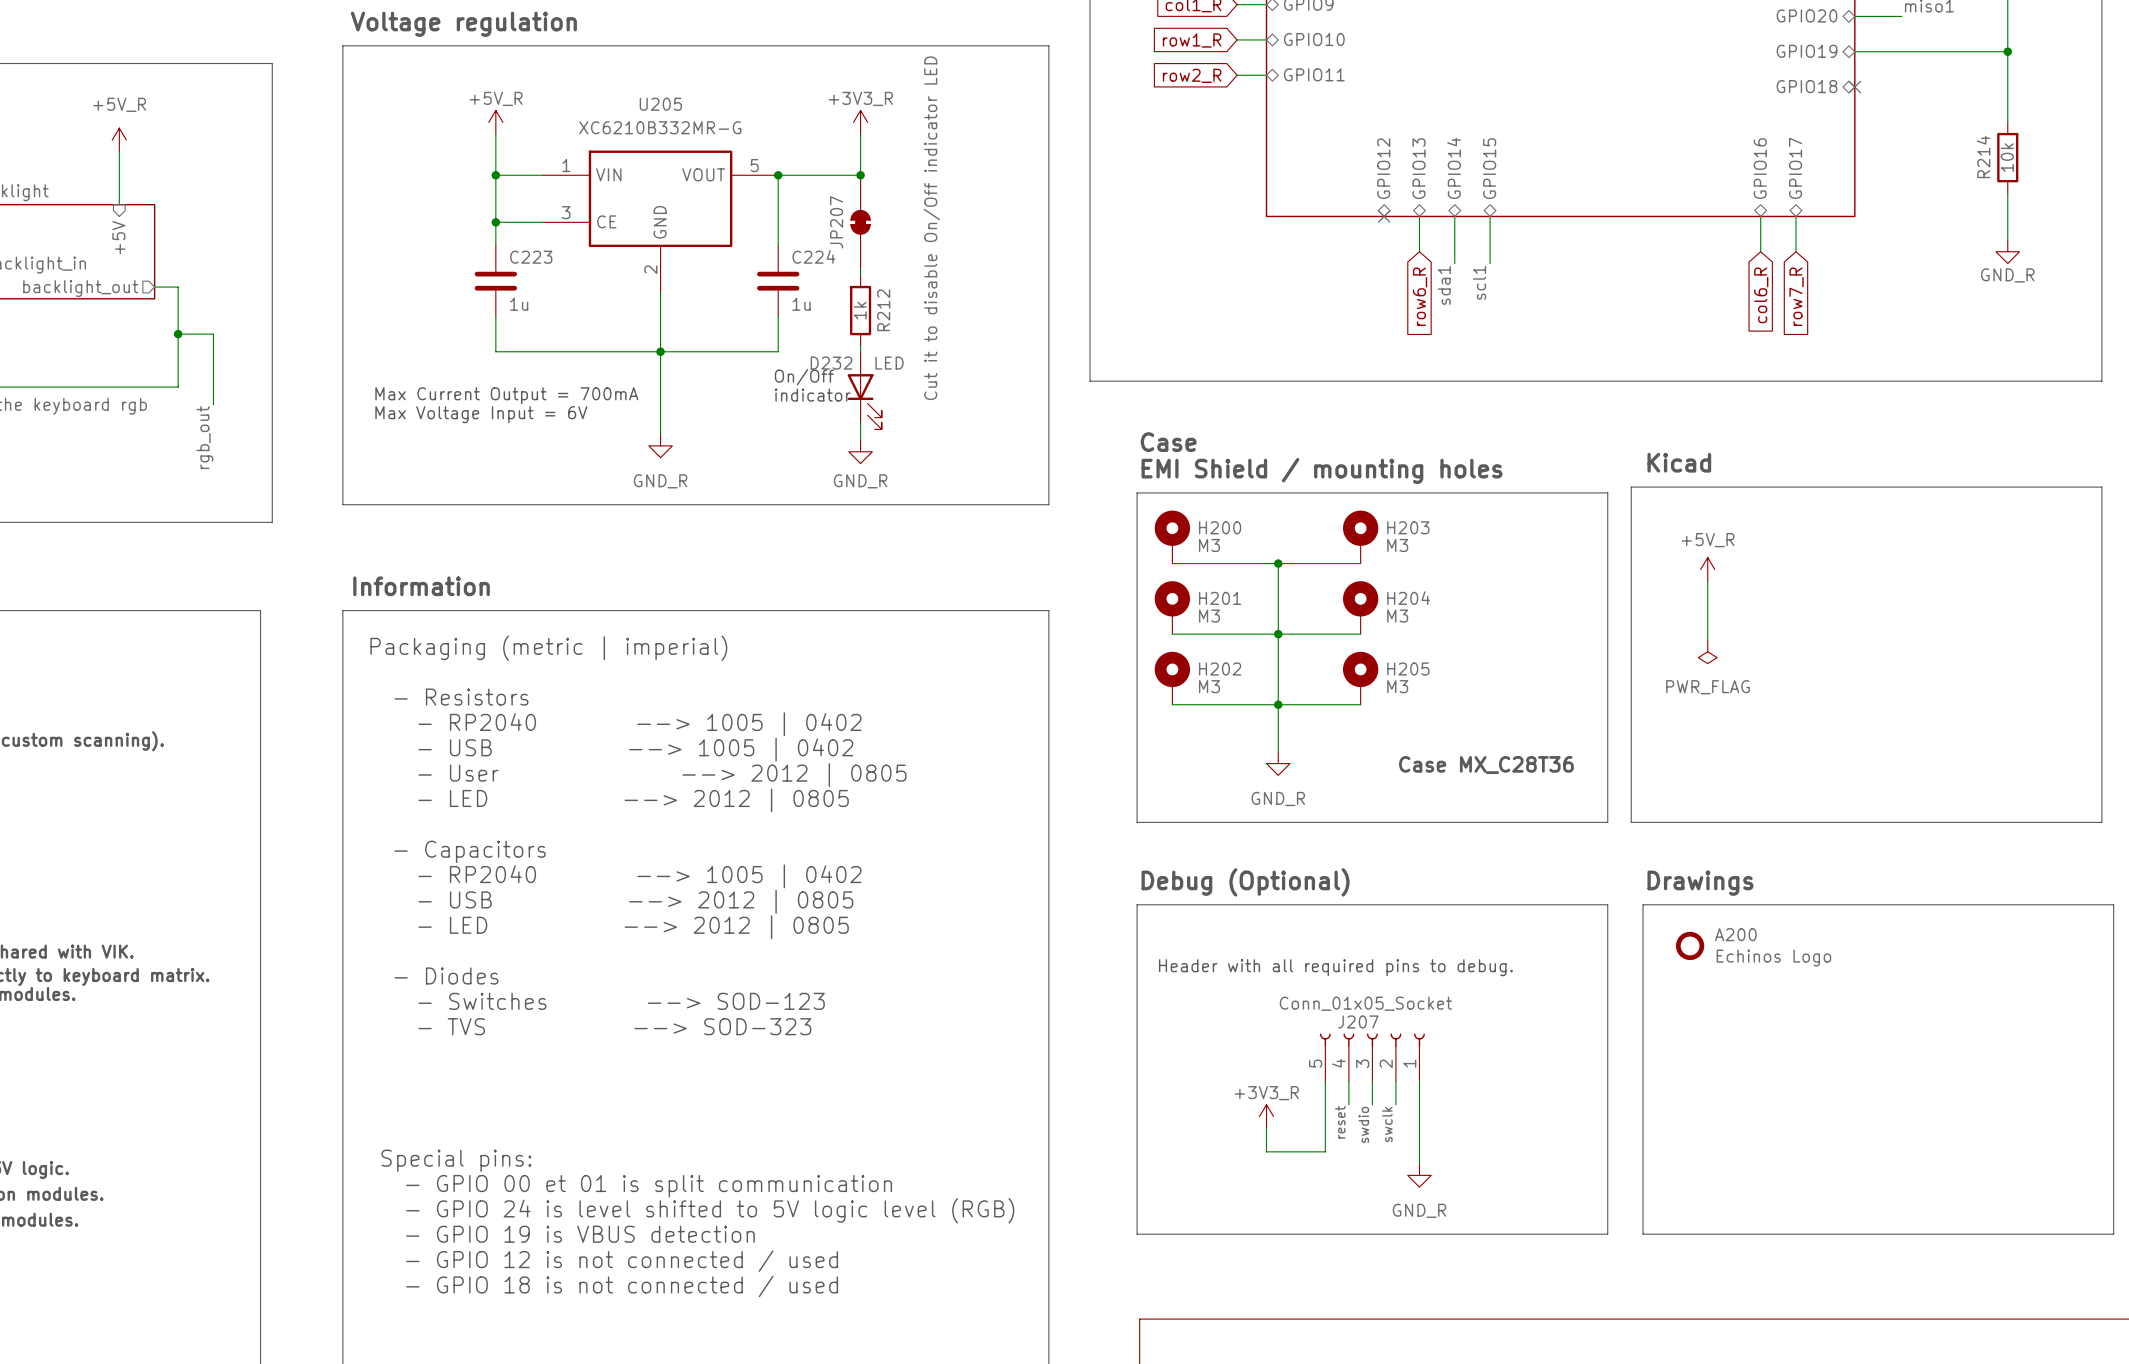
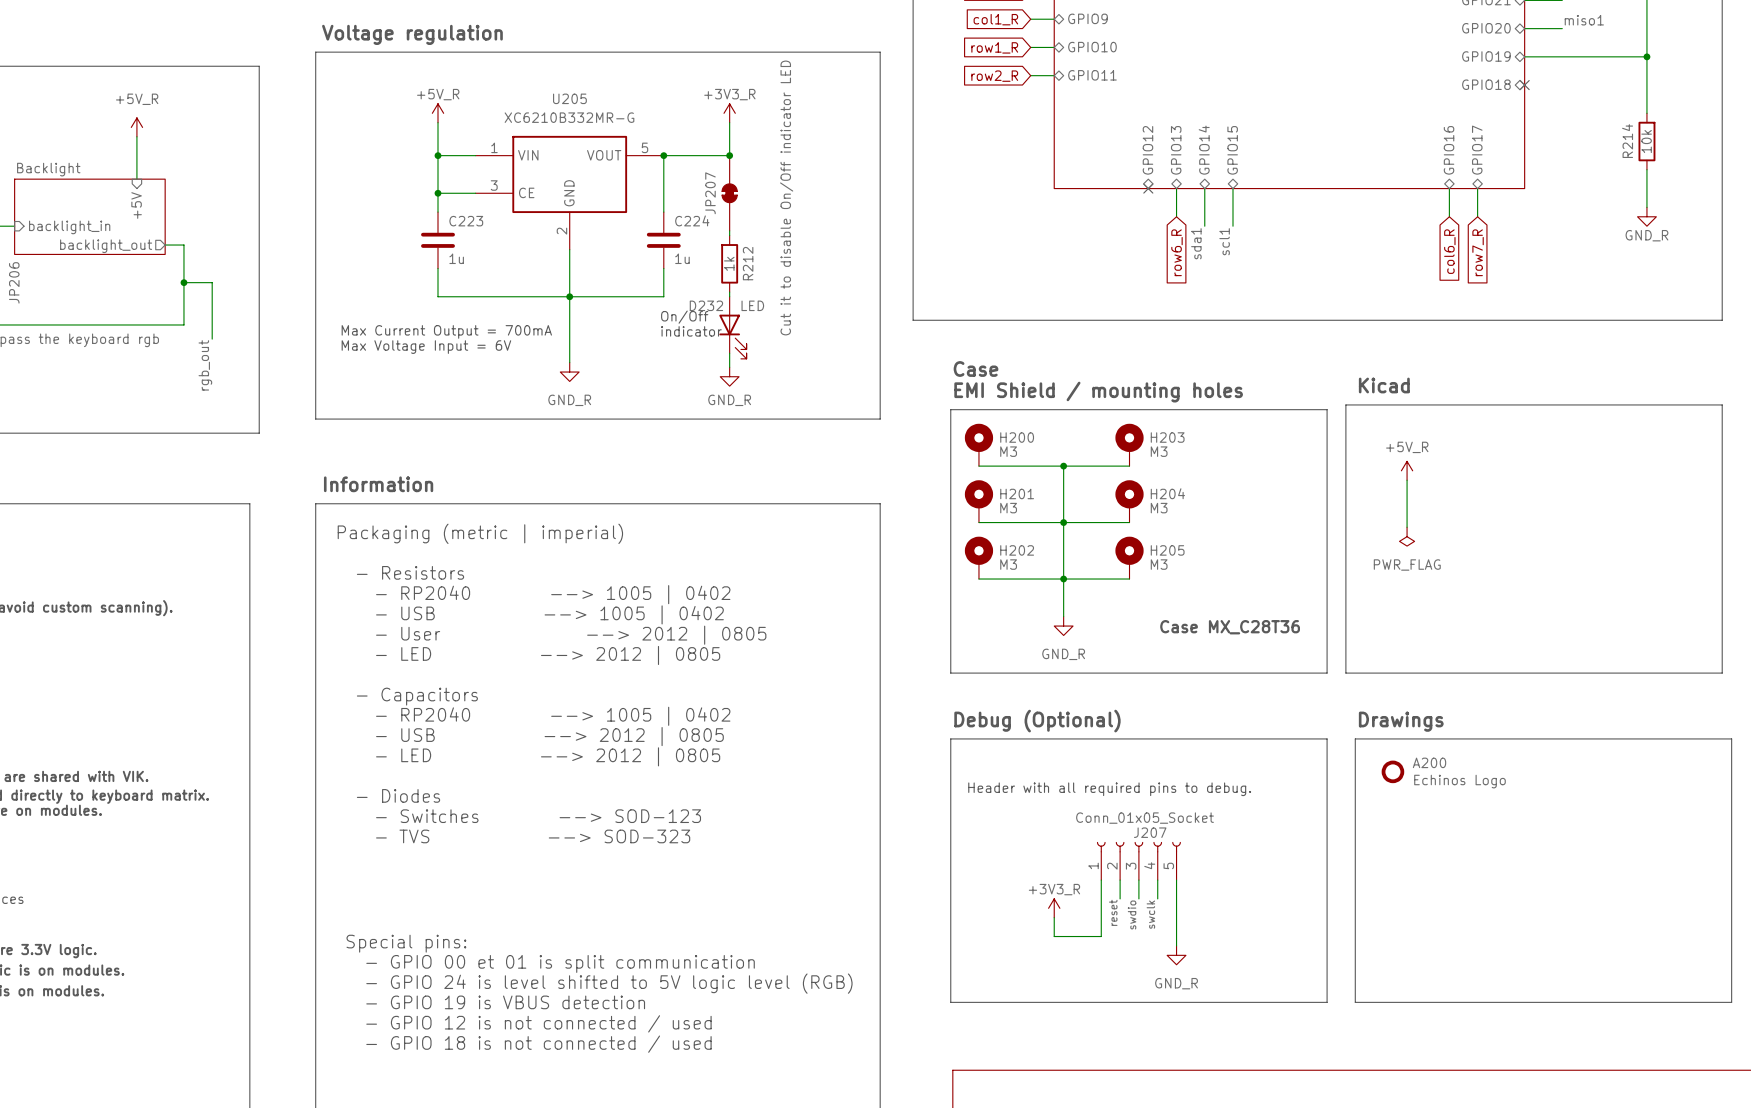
J207 flip: as is (1372, 1040) -> left-right (1138, 847)

